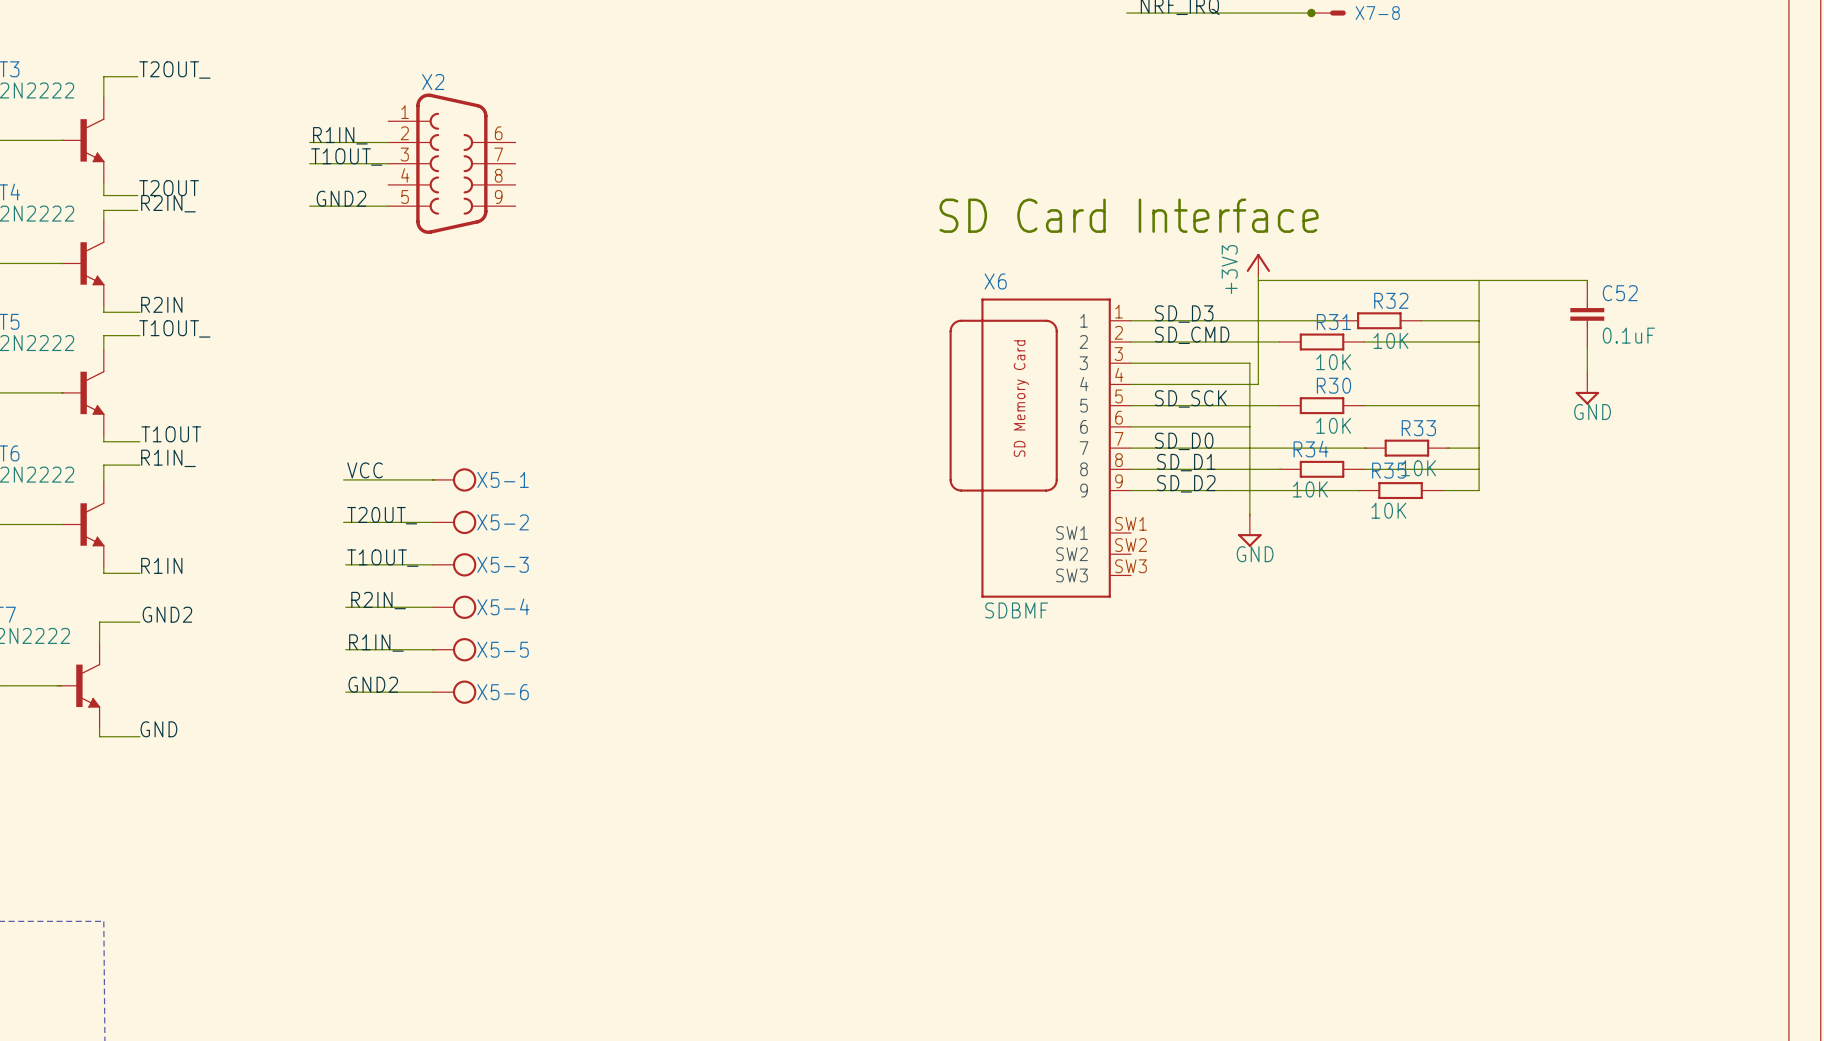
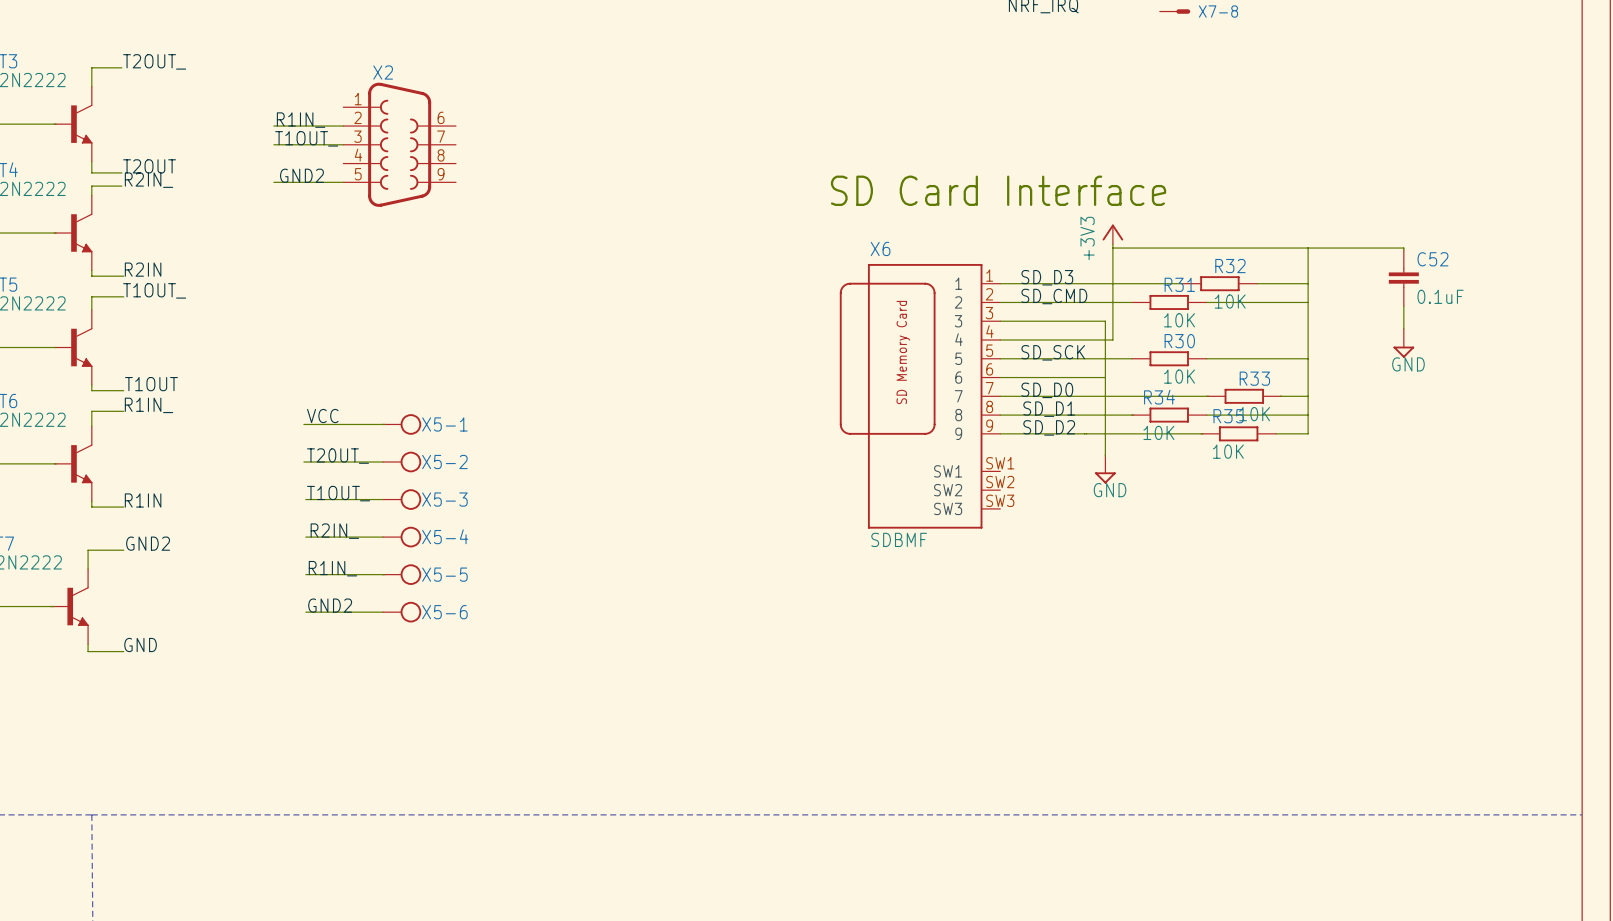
wire: (1126, 13) (1311, 13) -> none
junction: (1311, 13) -> none
bus: none -> (91, 814) (1582, 814)

